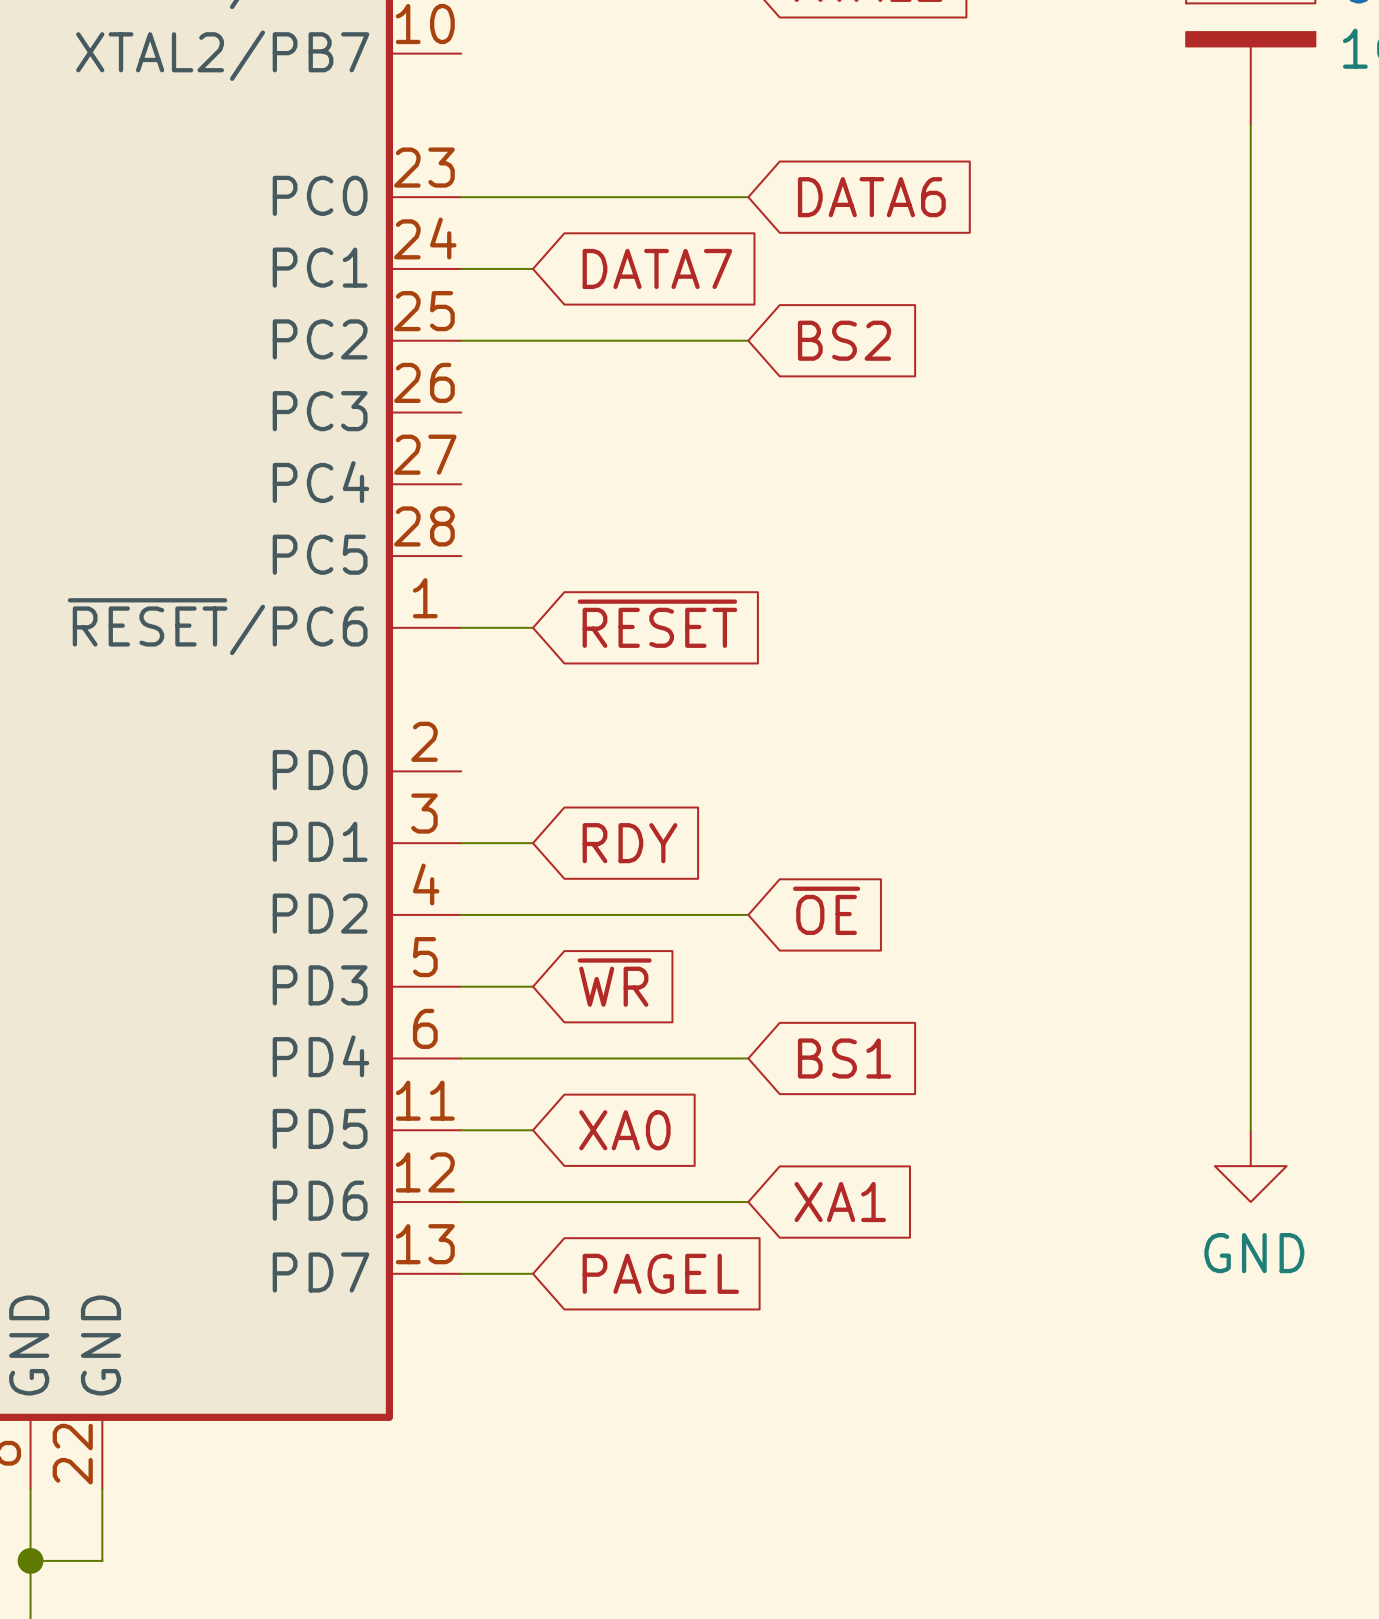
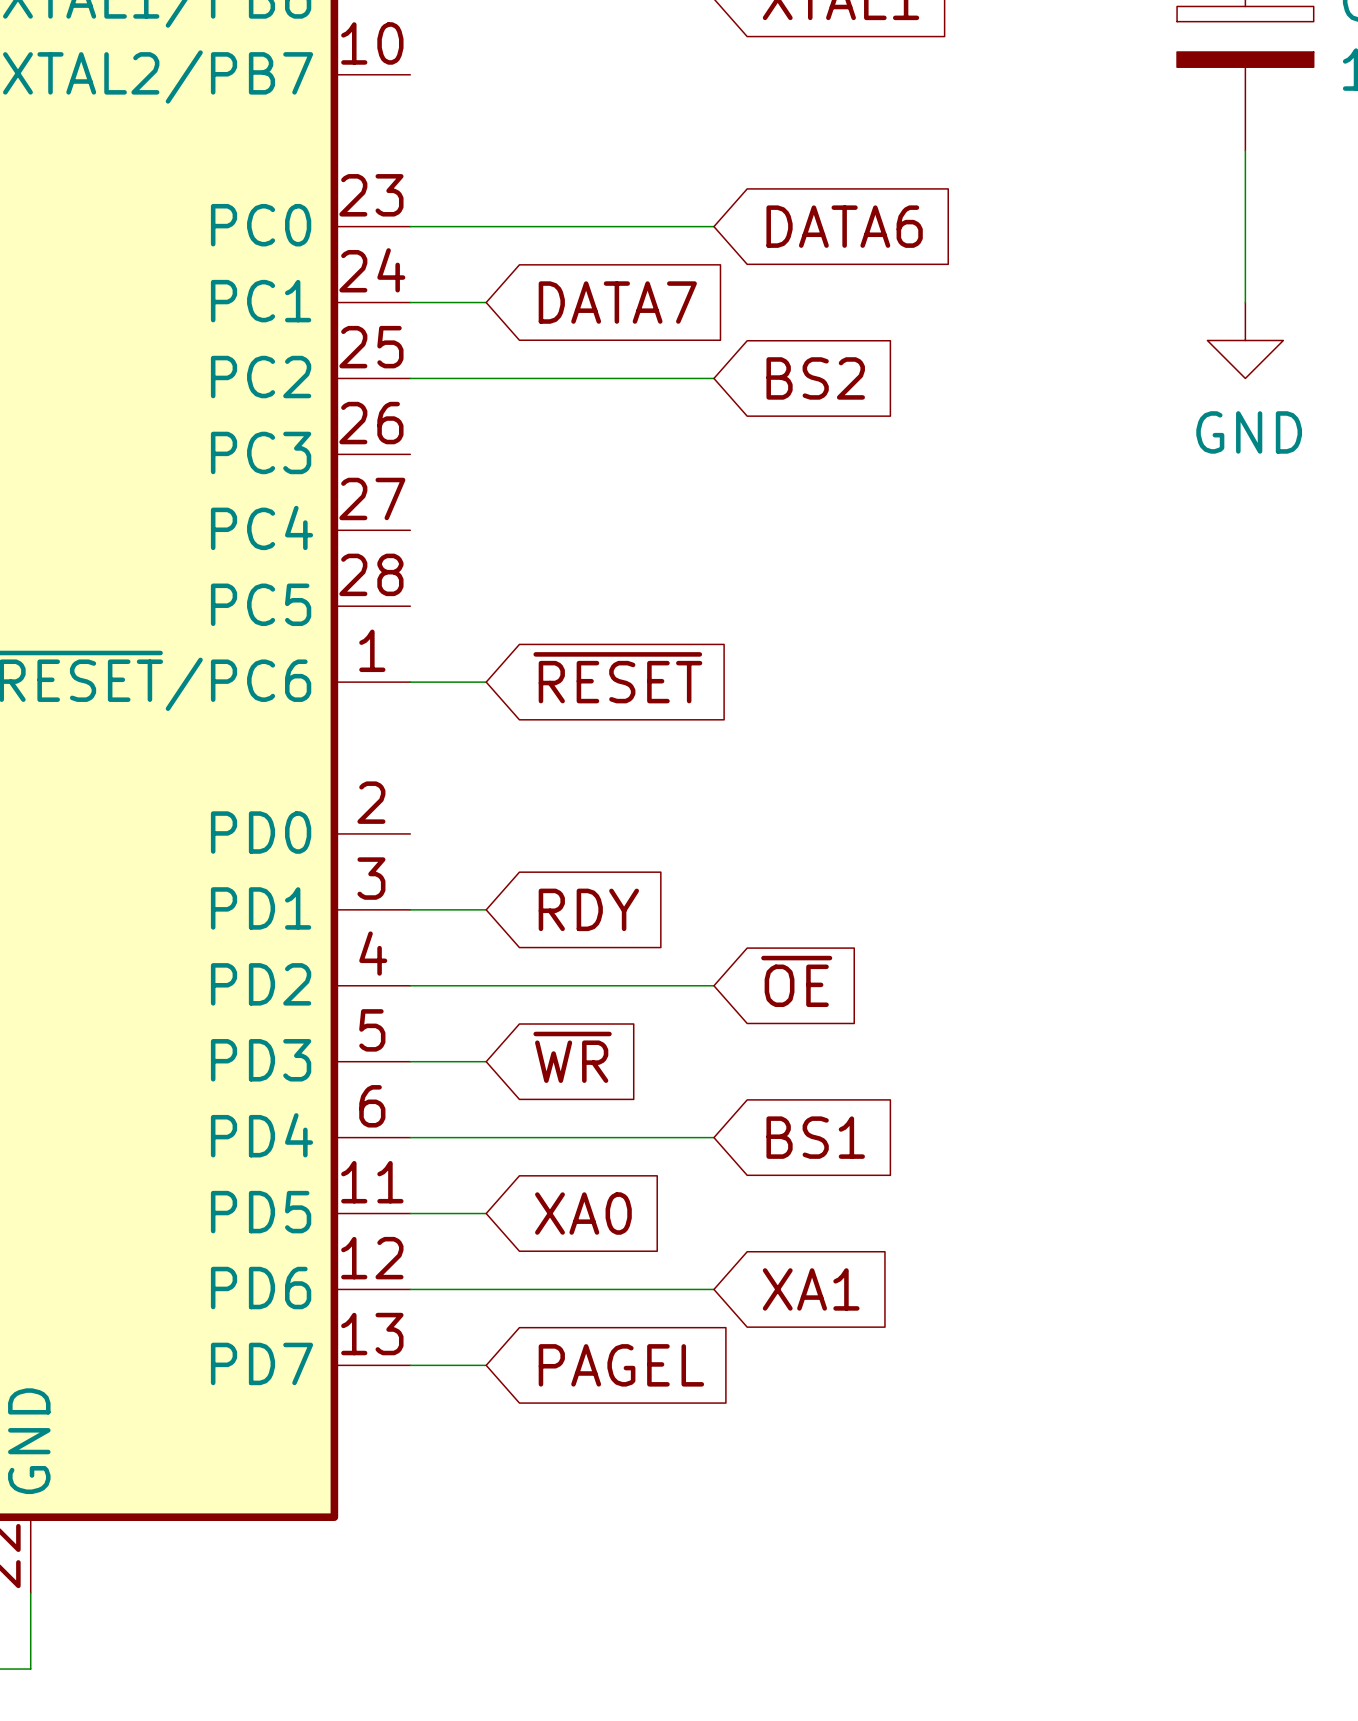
wire: (1250, 268) (1250, 1130) -> none
power symbol: none -> GND (1245, 340)
power symbol: GND (1250, 1166) -> none

